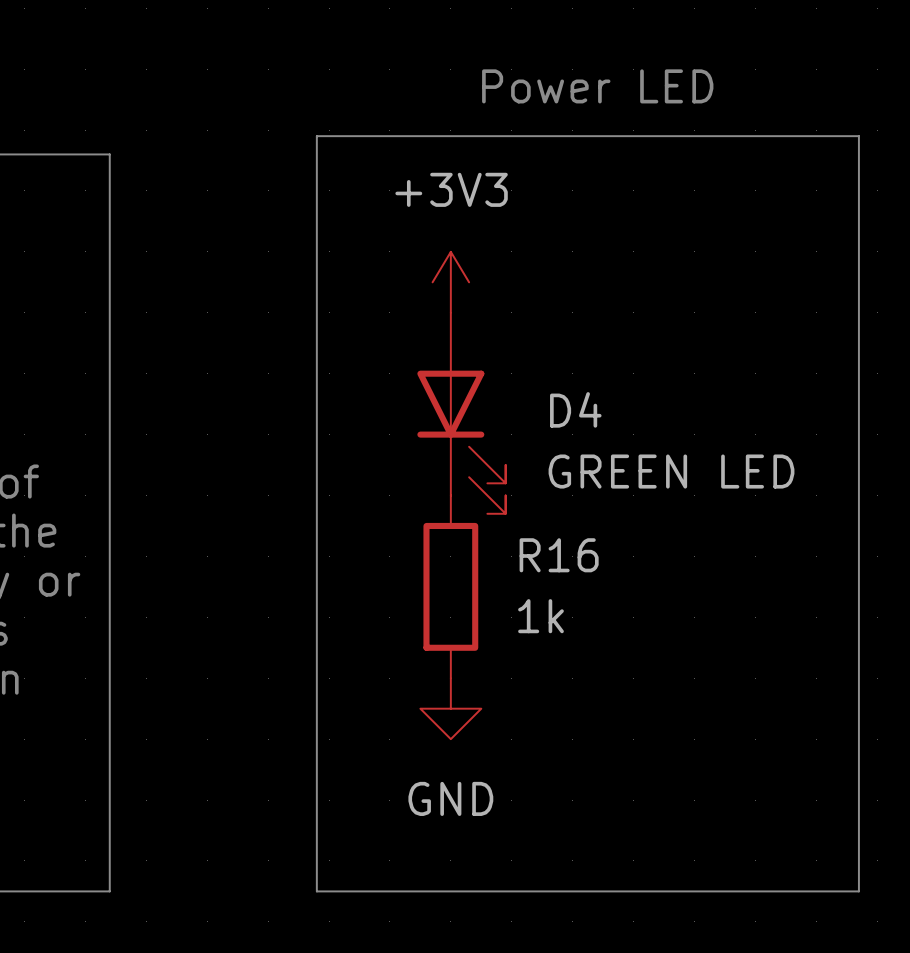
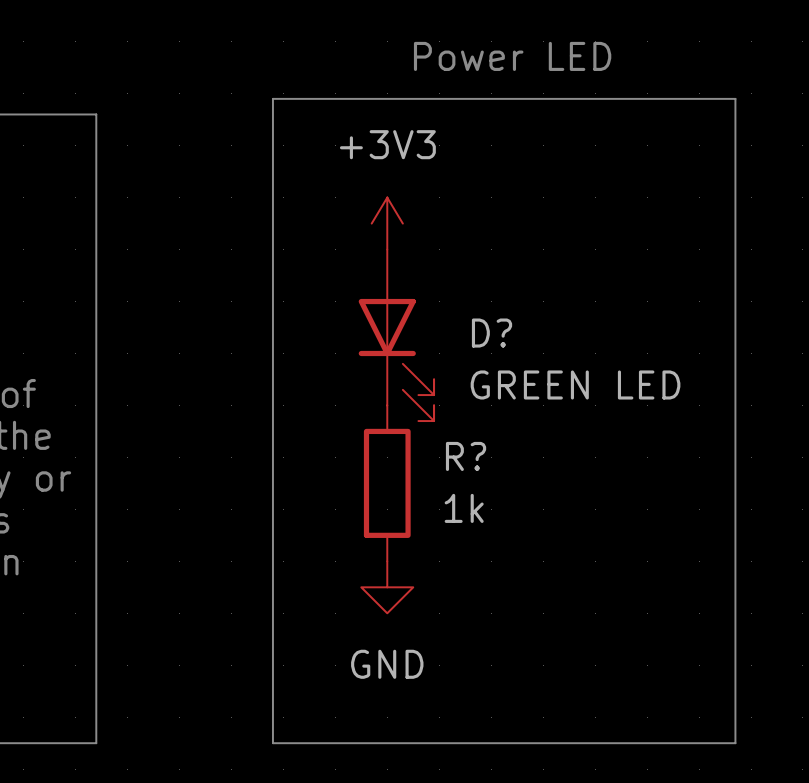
D4 name: D4 (575, 409) -> D? (492, 333)
R16 name: R16 (559, 555) -> R? (466, 456)

